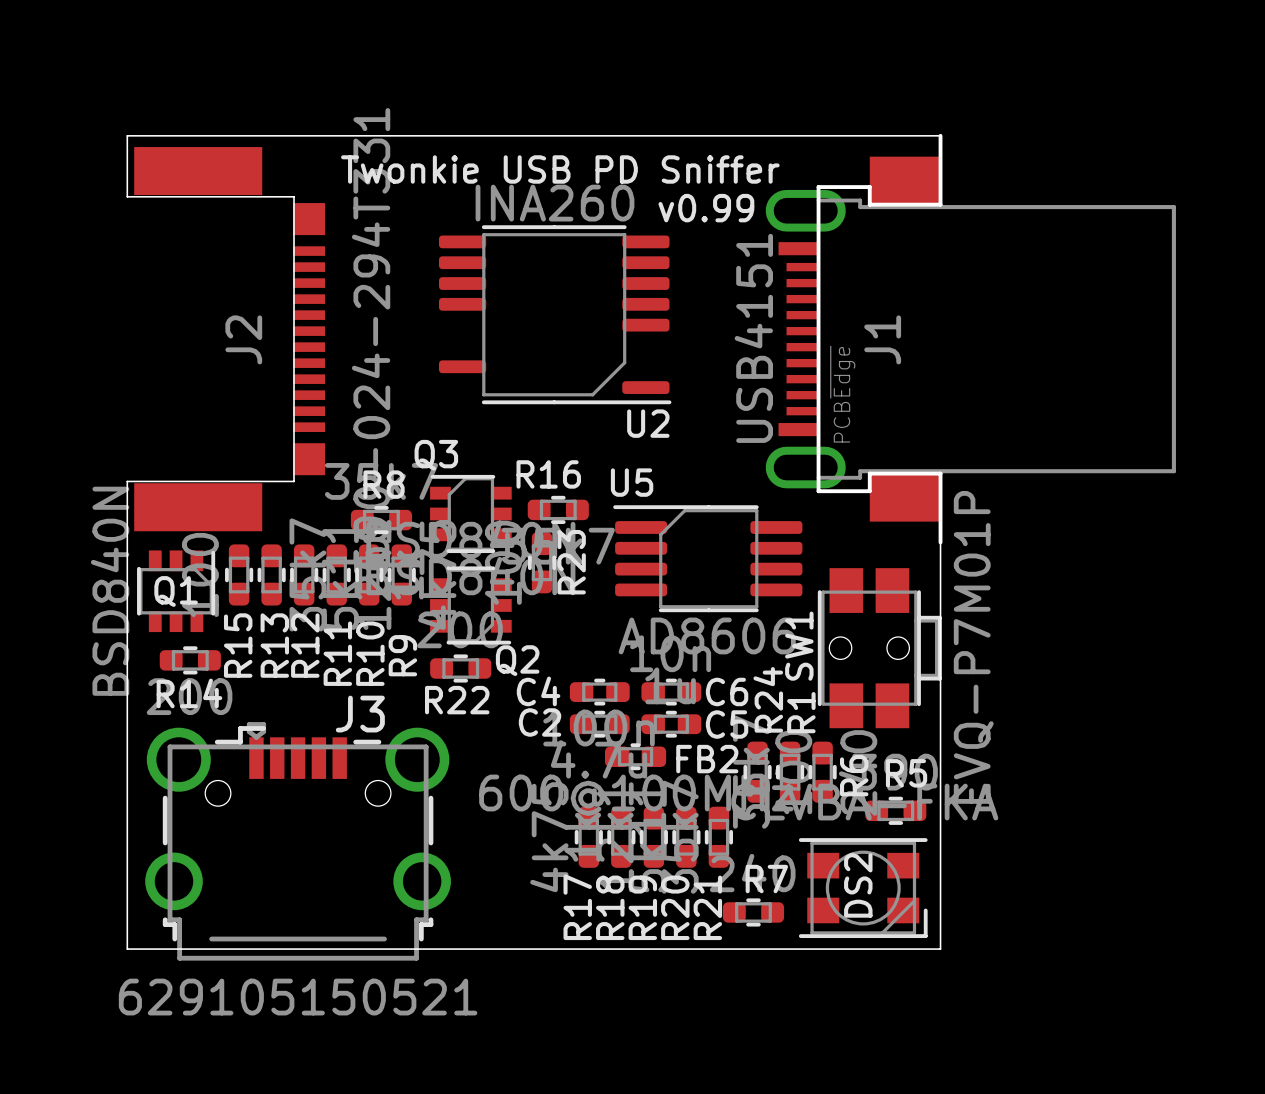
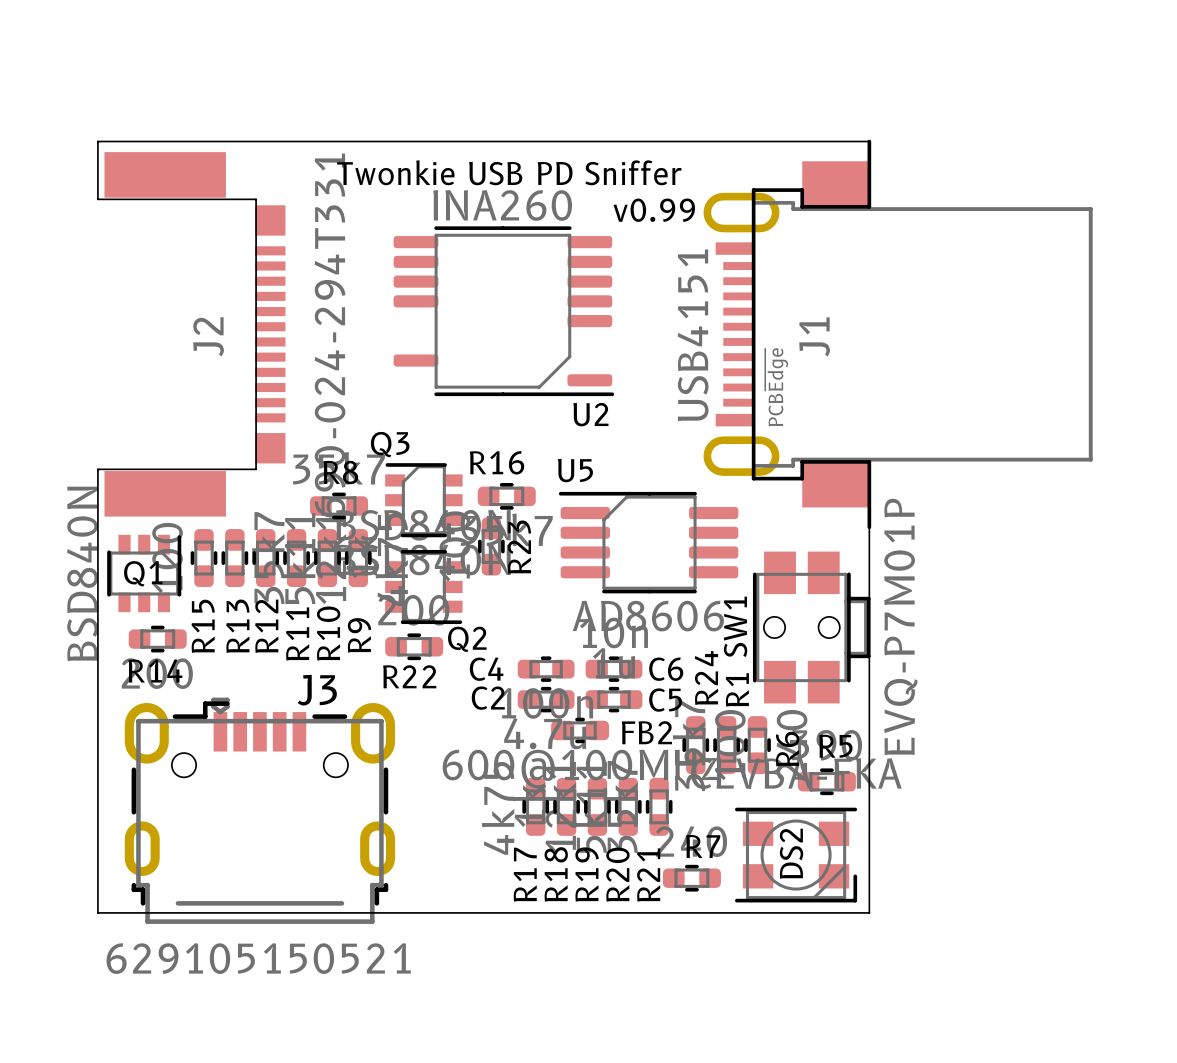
J3 footprint: [145, 722, 451, 961] -> [124, 697, 396, 924]

